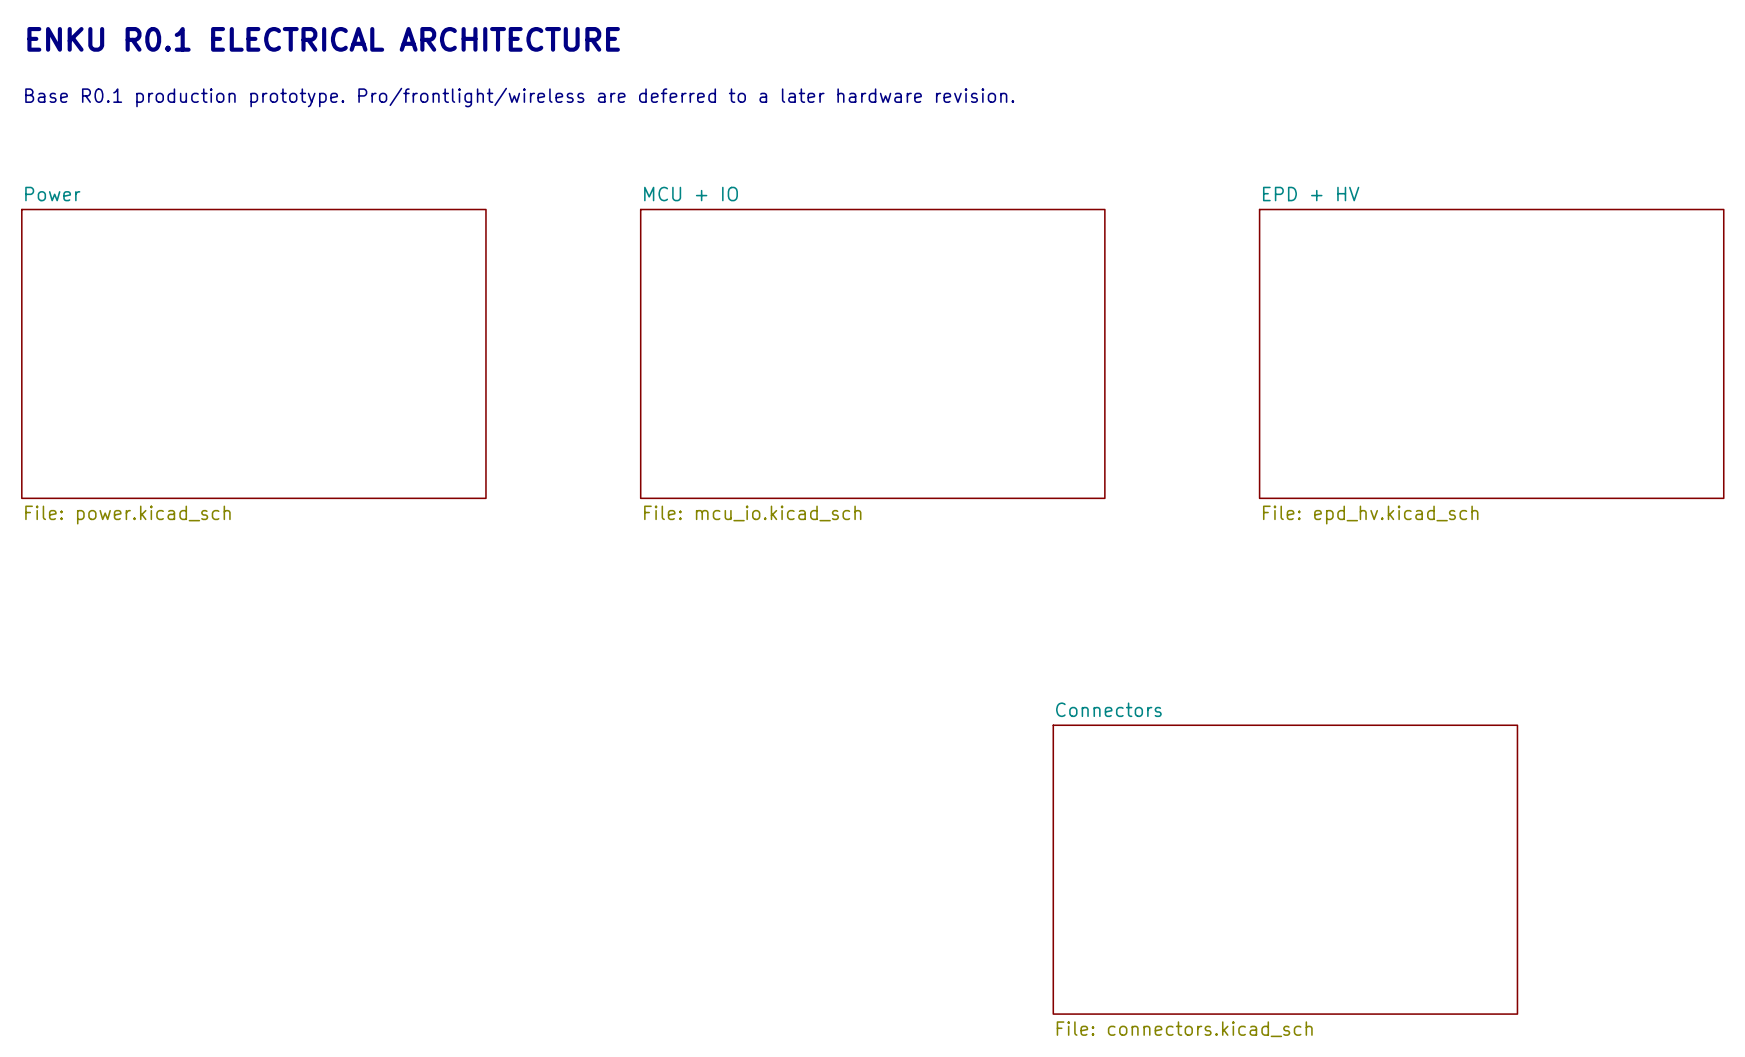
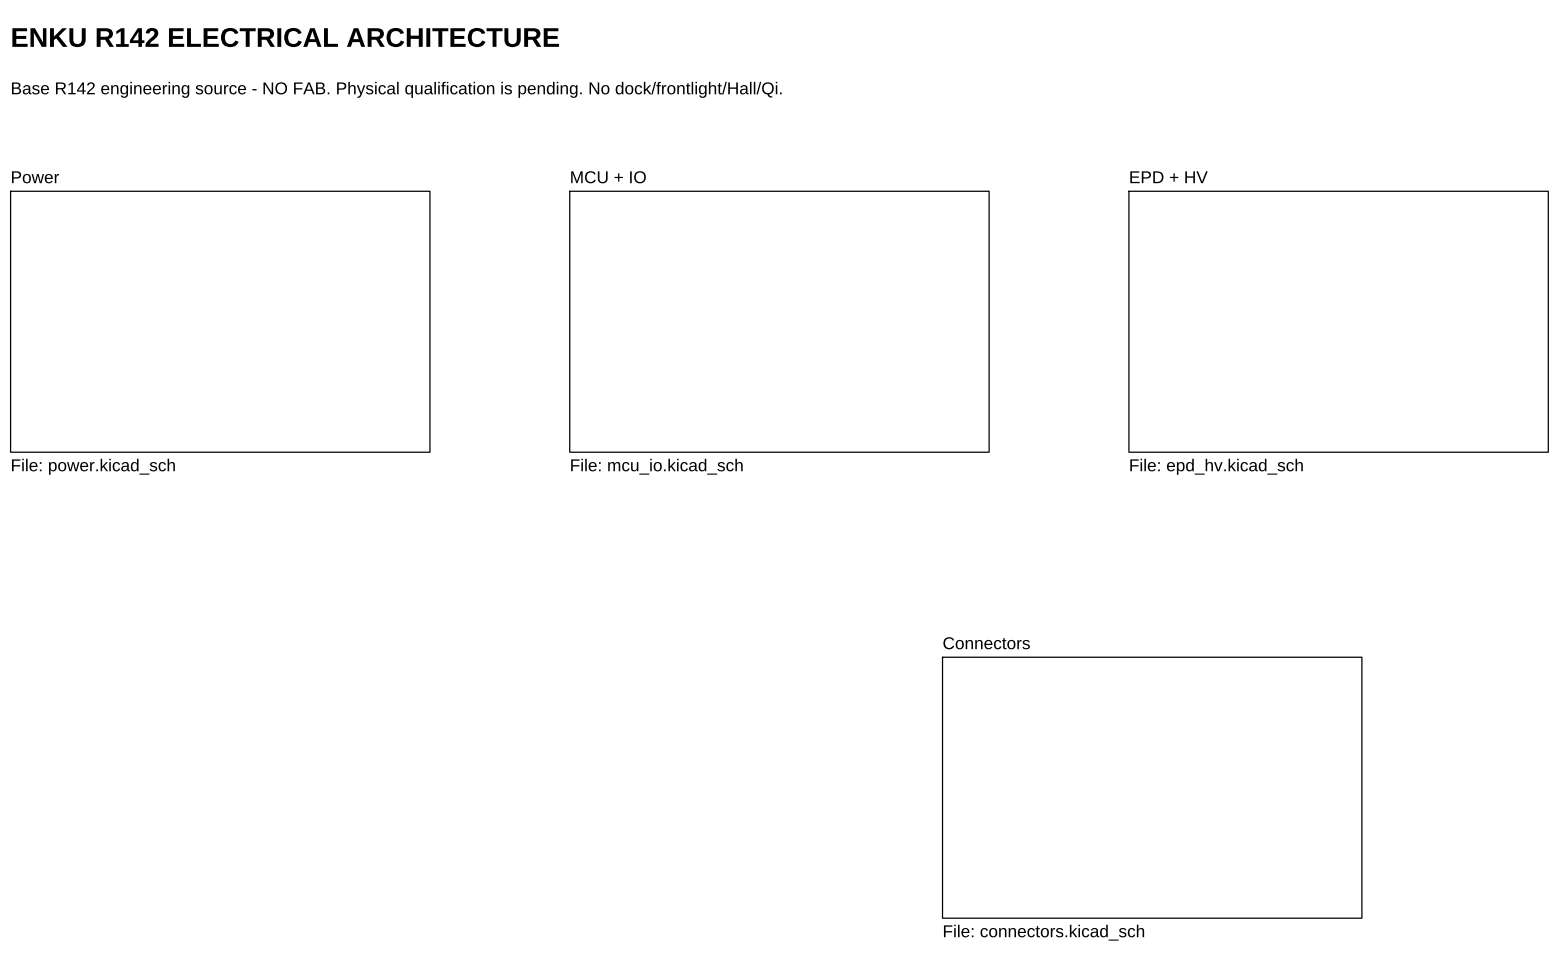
text: ENKU R0.1 ELECTRICAL ARCHITECTURE (323, 39) -> ENKU R142 ELECTRICAL ARCHITECTURE (285, 37)
text: Base R0.1 production prototype. Pro/frontlight/wireless are deferred to a later hardware revision. (519, 97) -> Base R142 engineering source - NO FAB. Physical qualification is pending. No dock/frontlight/Hall/Qi. (396, 89)

